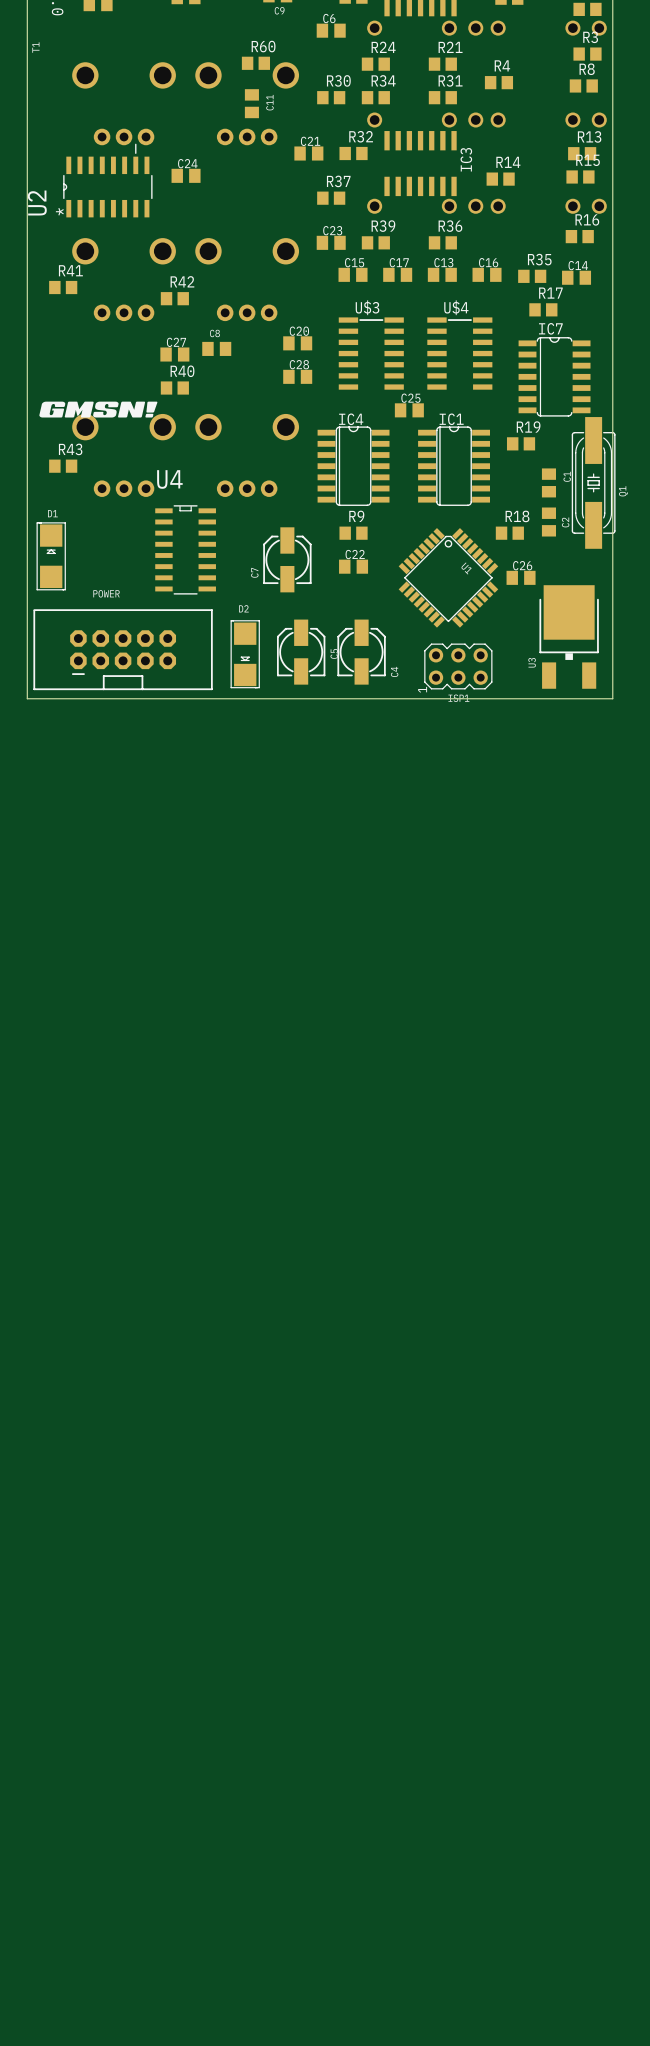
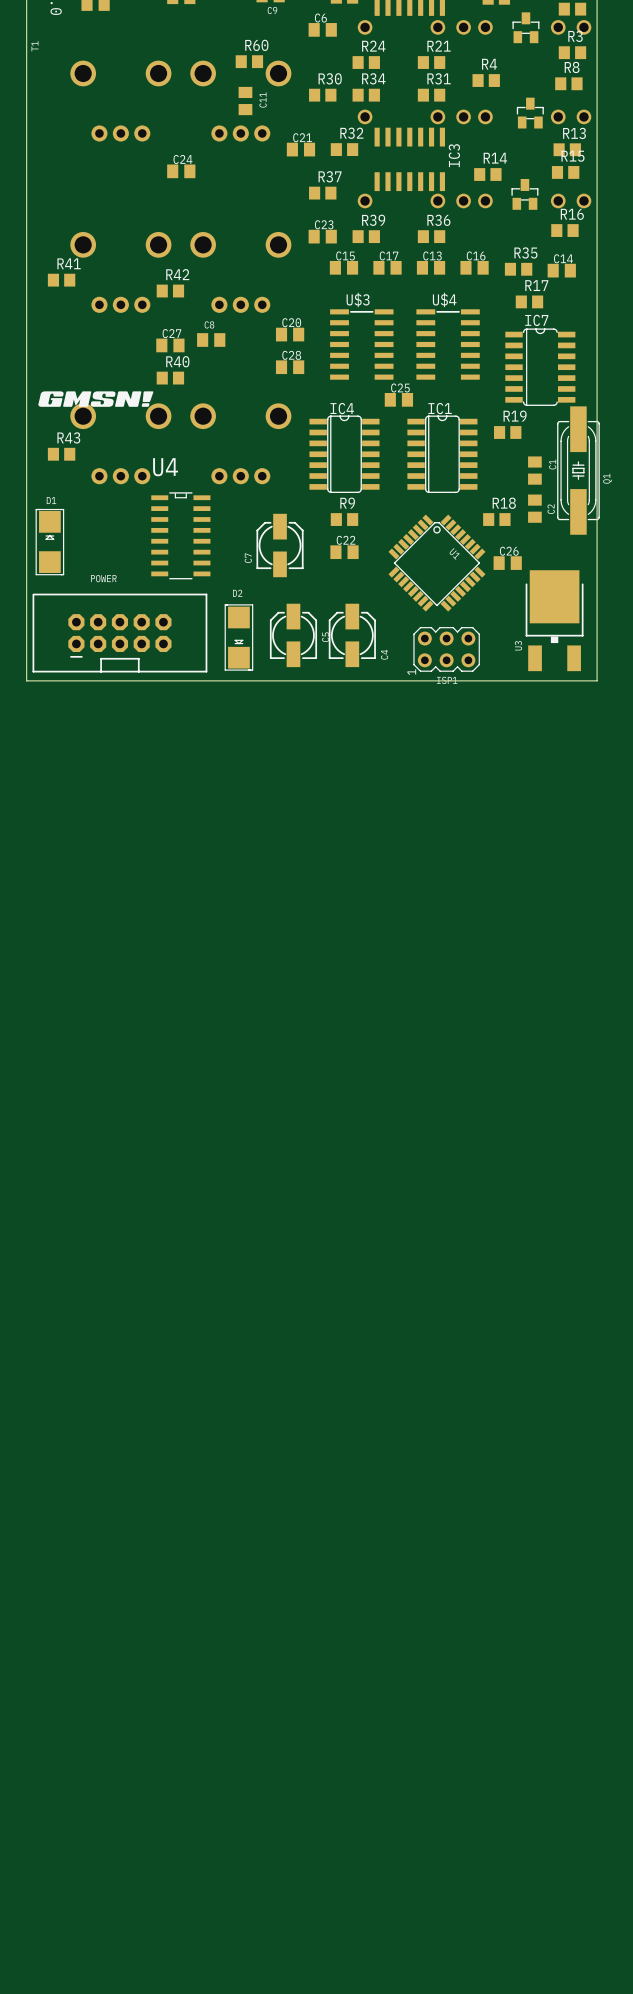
part: none -> (525, 27)
part: none -> (530, 113)
U2: (107, 180) -> none
part: none -> (524, 194)

